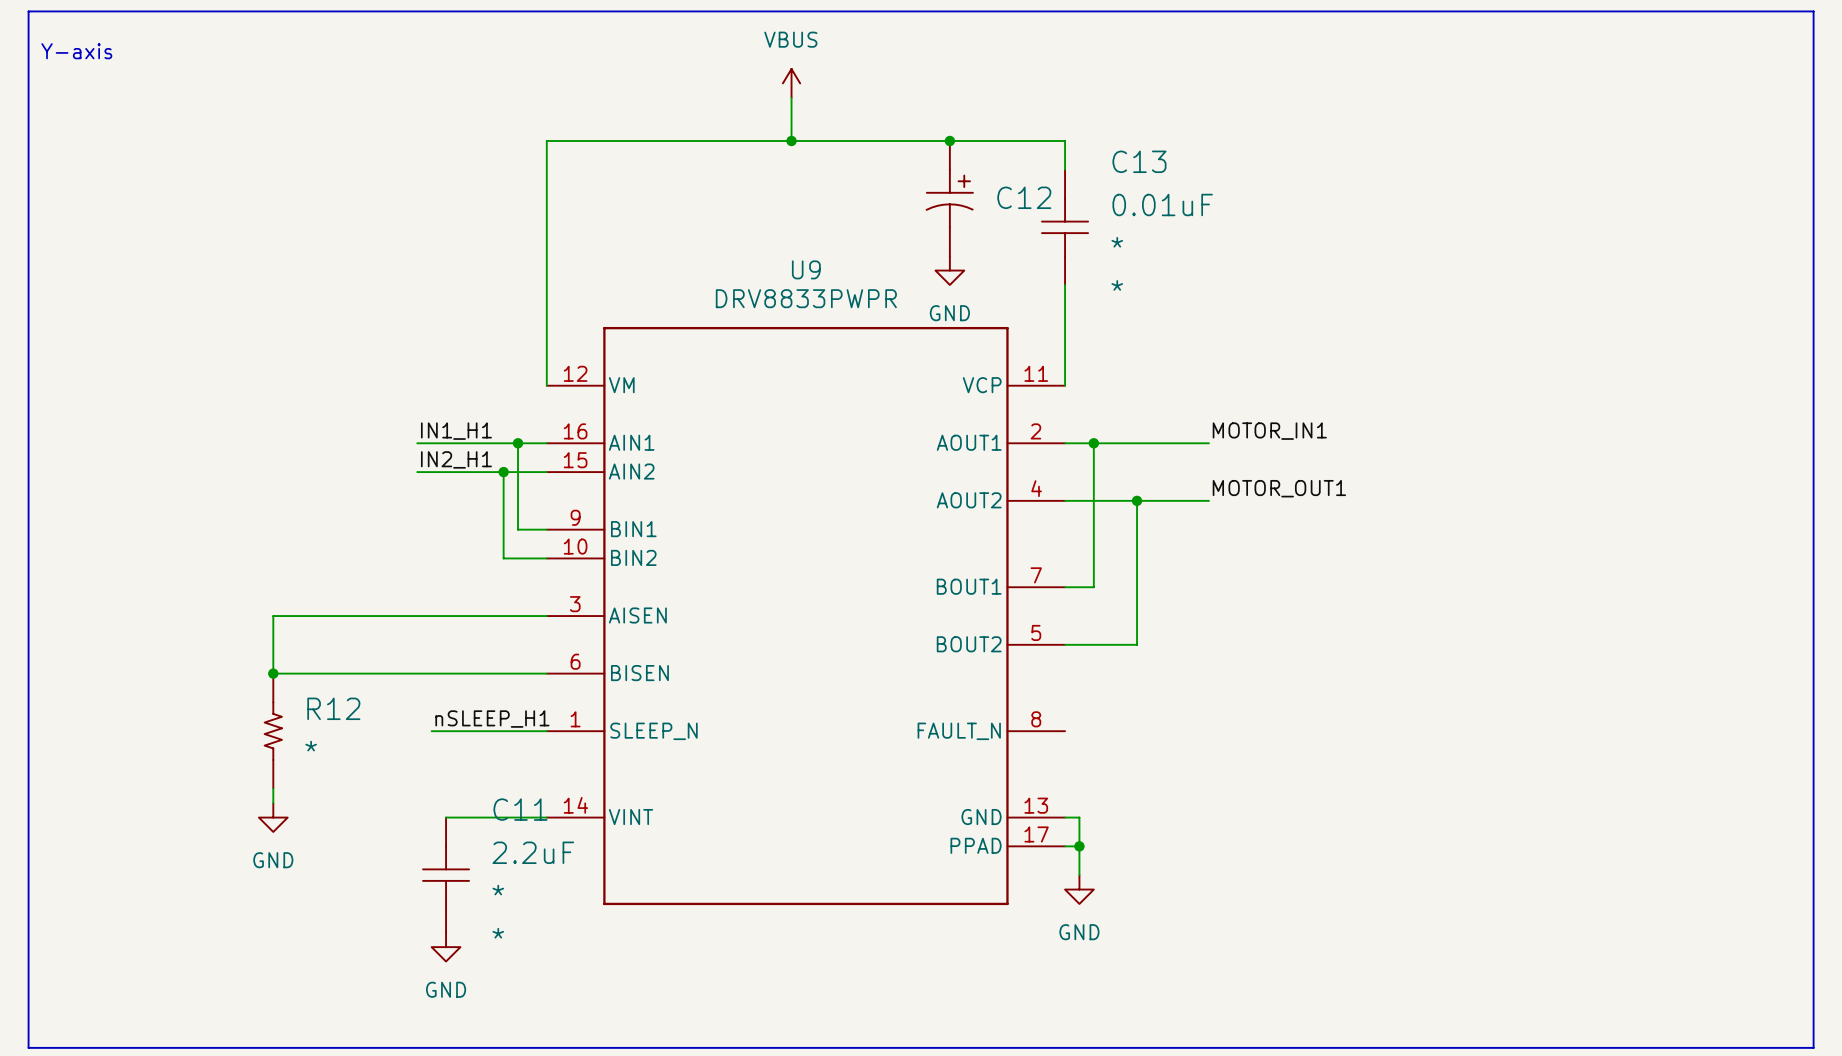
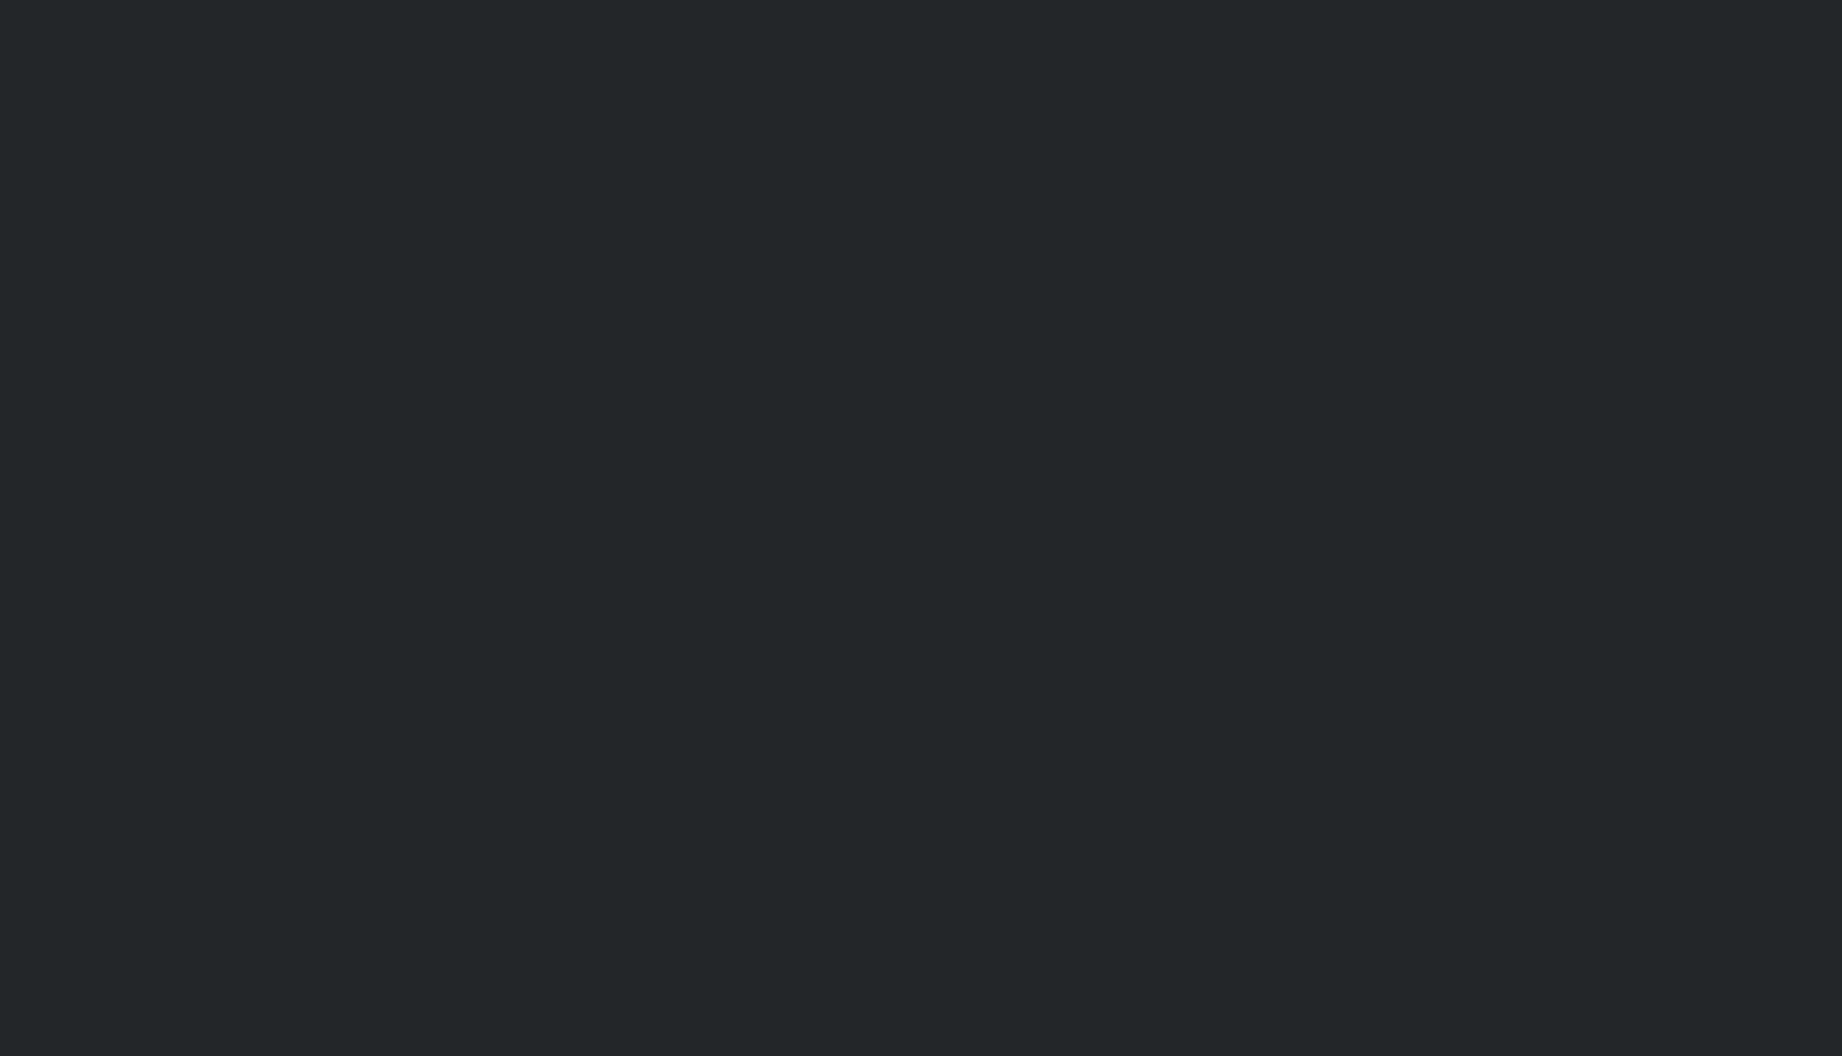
line: (28, 11) (1813, 11) (1813, 1047) (28, 1047) (28, 11) -> none
text: Y-axis (76, 51) -> none
power symbol: VBUS (791, 83) -> none
wire: (791, 97) (791, 140) -> none
junction: (791, 140) -> none
junction: (949, 140) -> none
wire: (1065, 169) (1065, 140) (546, 140) (546, 385) -> none
C12: (949, 198) -> none
C13: 0.01uF (1065, 227) -> none
power symbol: GND (949, 270) -> none
wire: (1065, 284) (1065, 385) -> none
label: IN1_H1 (456, 431) -> none
label: MOTOR_IN1 (1269, 431) -> none
wire: (417, 443) (546, 443) -> none
wire: (518, 443) (518, 529) (546, 529) -> none
junction: (518, 443) -> none
wire: (1065, 443) (1208, 443) -> none
wire: (1093, 443) (1093, 587) (1065, 587) -> none
junction: (1093, 443) -> none
label: IN2_H1 (456, 459) -> none
wire: (417, 472) (546, 472) -> none
wire: (503, 472) (503, 558) (546, 558) -> none
junction: (503, 472) -> none
label: MOTOR_OUT1 (1279, 488) -> none
wire: (1065, 500) (1208, 500) -> none
wire: (1137, 500) (1137, 644) (1065, 644) -> none
junction: (1137, 500) -> none
wire: (546, 616) (273, 616) (273, 673) (546, 673) -> none
U9: DRV8833PWPR (805, 616) -> none
junction: (273, 673) -> none
label: nSLEEP_H1 (492, 719) -> none
R12: * (273, 731) -> none
wire: (431, 731) (546, 731) -> none
wire: (273, 788) (273, 803) -> none
power symbol: GND (273, 817) -> none
wire: (446, 817) (546, 817) -> none
wire: (1065, 817) (1079, 817) (1079, 875) -> none
wire: (1065, 846) (1079, 846) -> none
junction: (1079, 846) -> none
C11: 2.2uF (446, 875) -> none
power symbol: GND (1079, 889) -> none
power symbol: GND (446, 947) -> none

